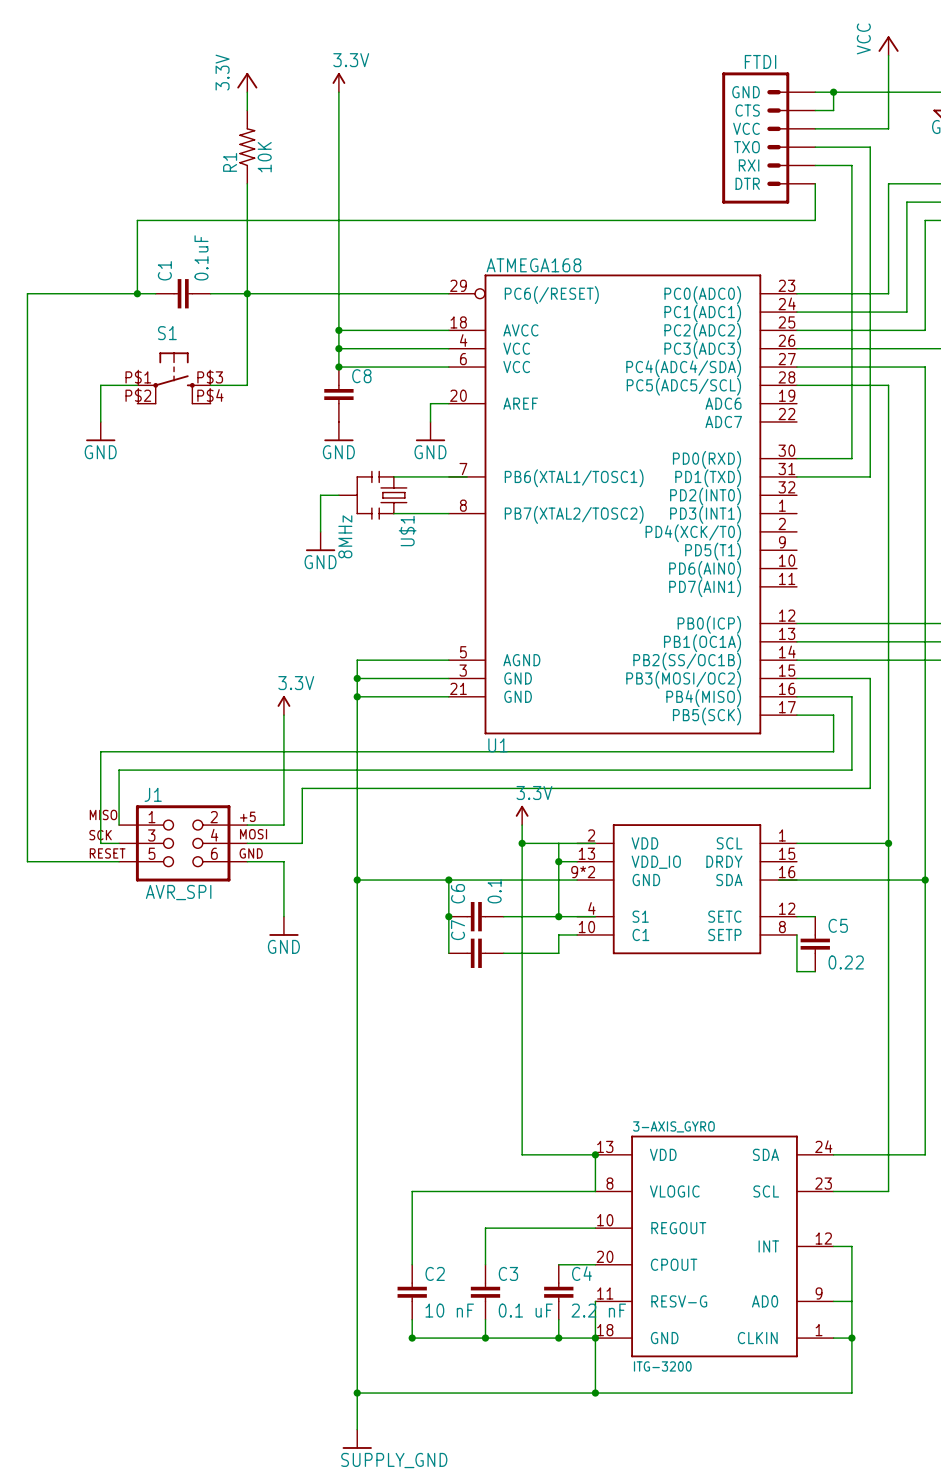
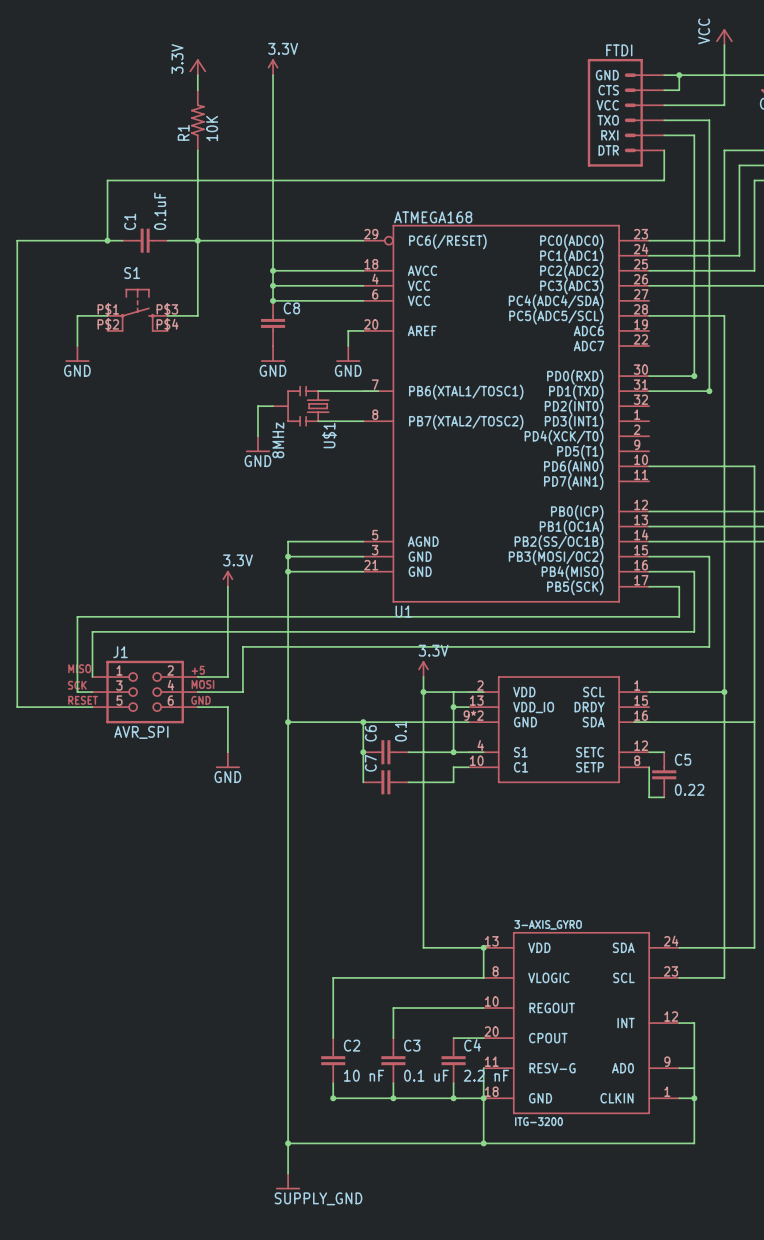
wire: (796, 367) (925, 367) (925, 568) -> (649, 466) (754, 466)
junction: none -> (694, 376)
junction: none -> (709, 391)
junction: (925, 880) -> none

